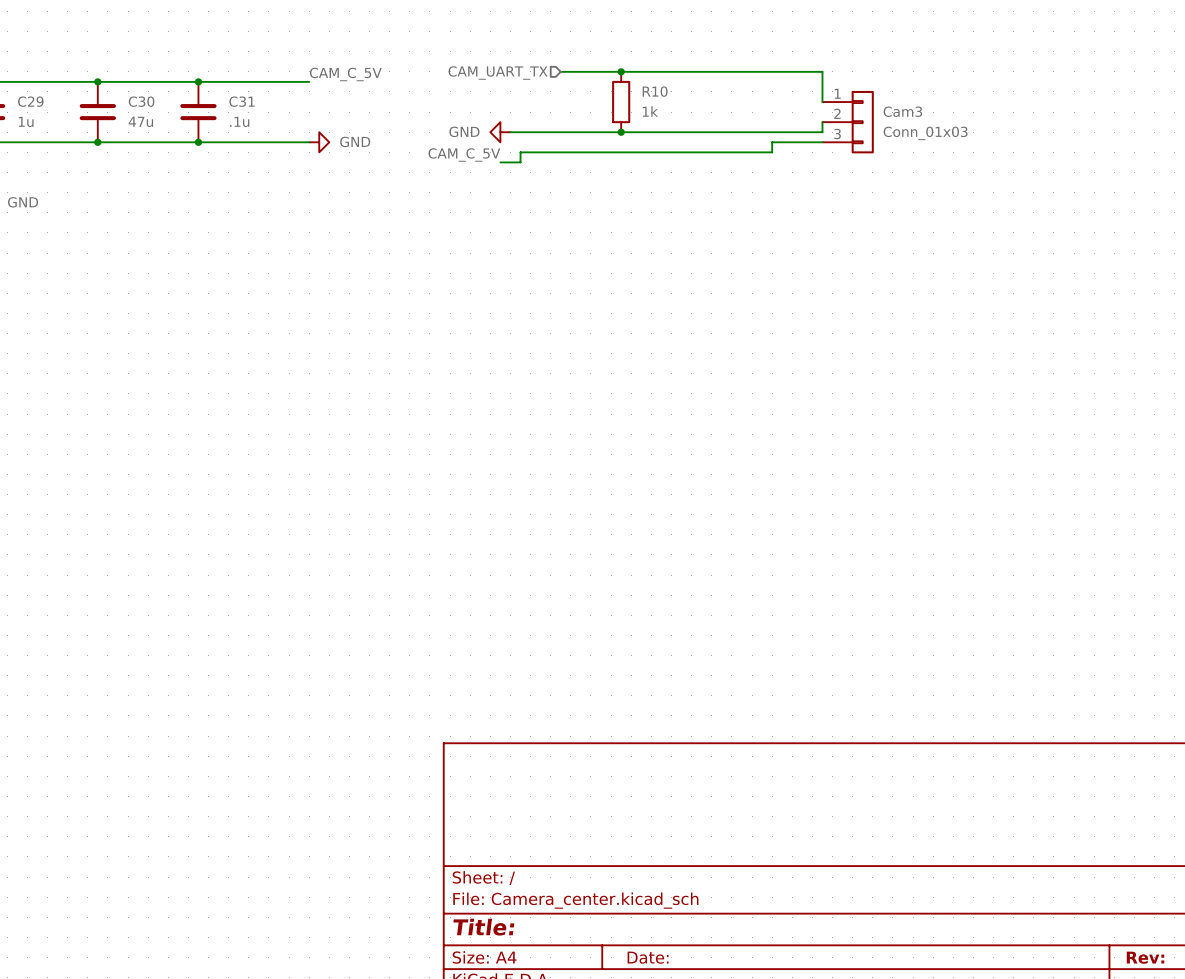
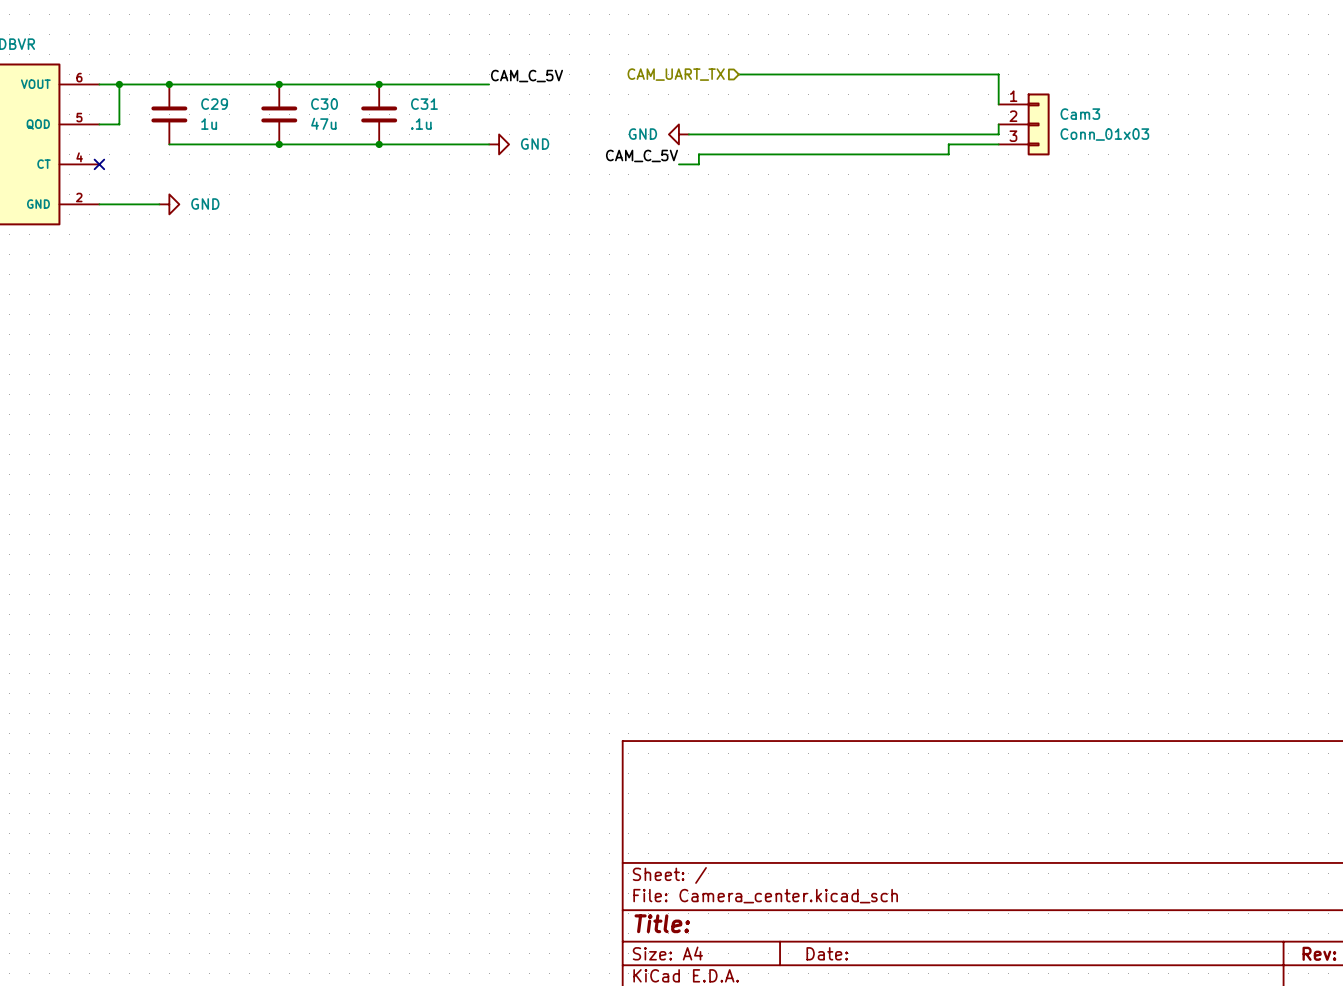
junction: (621, 71) -> none
R10: 1k (621, 102) -> none
junction: (621, 132) -> none

